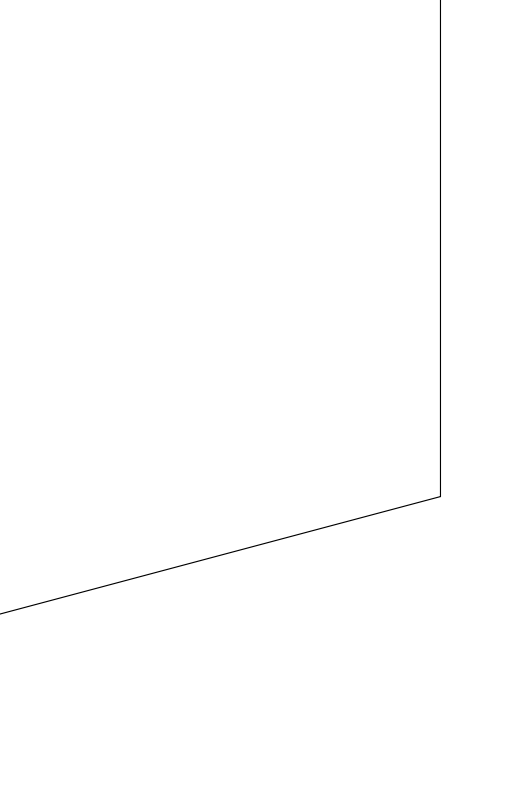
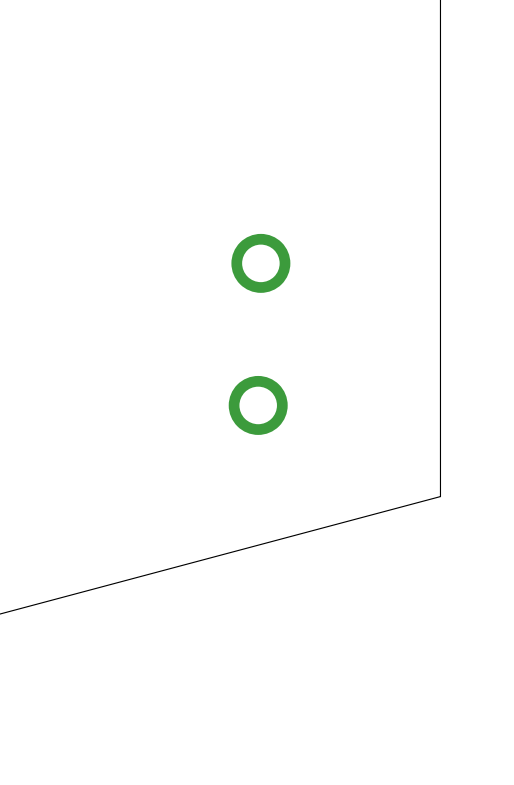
part: none -> (260, 263)
part: none -> (258, 405)

